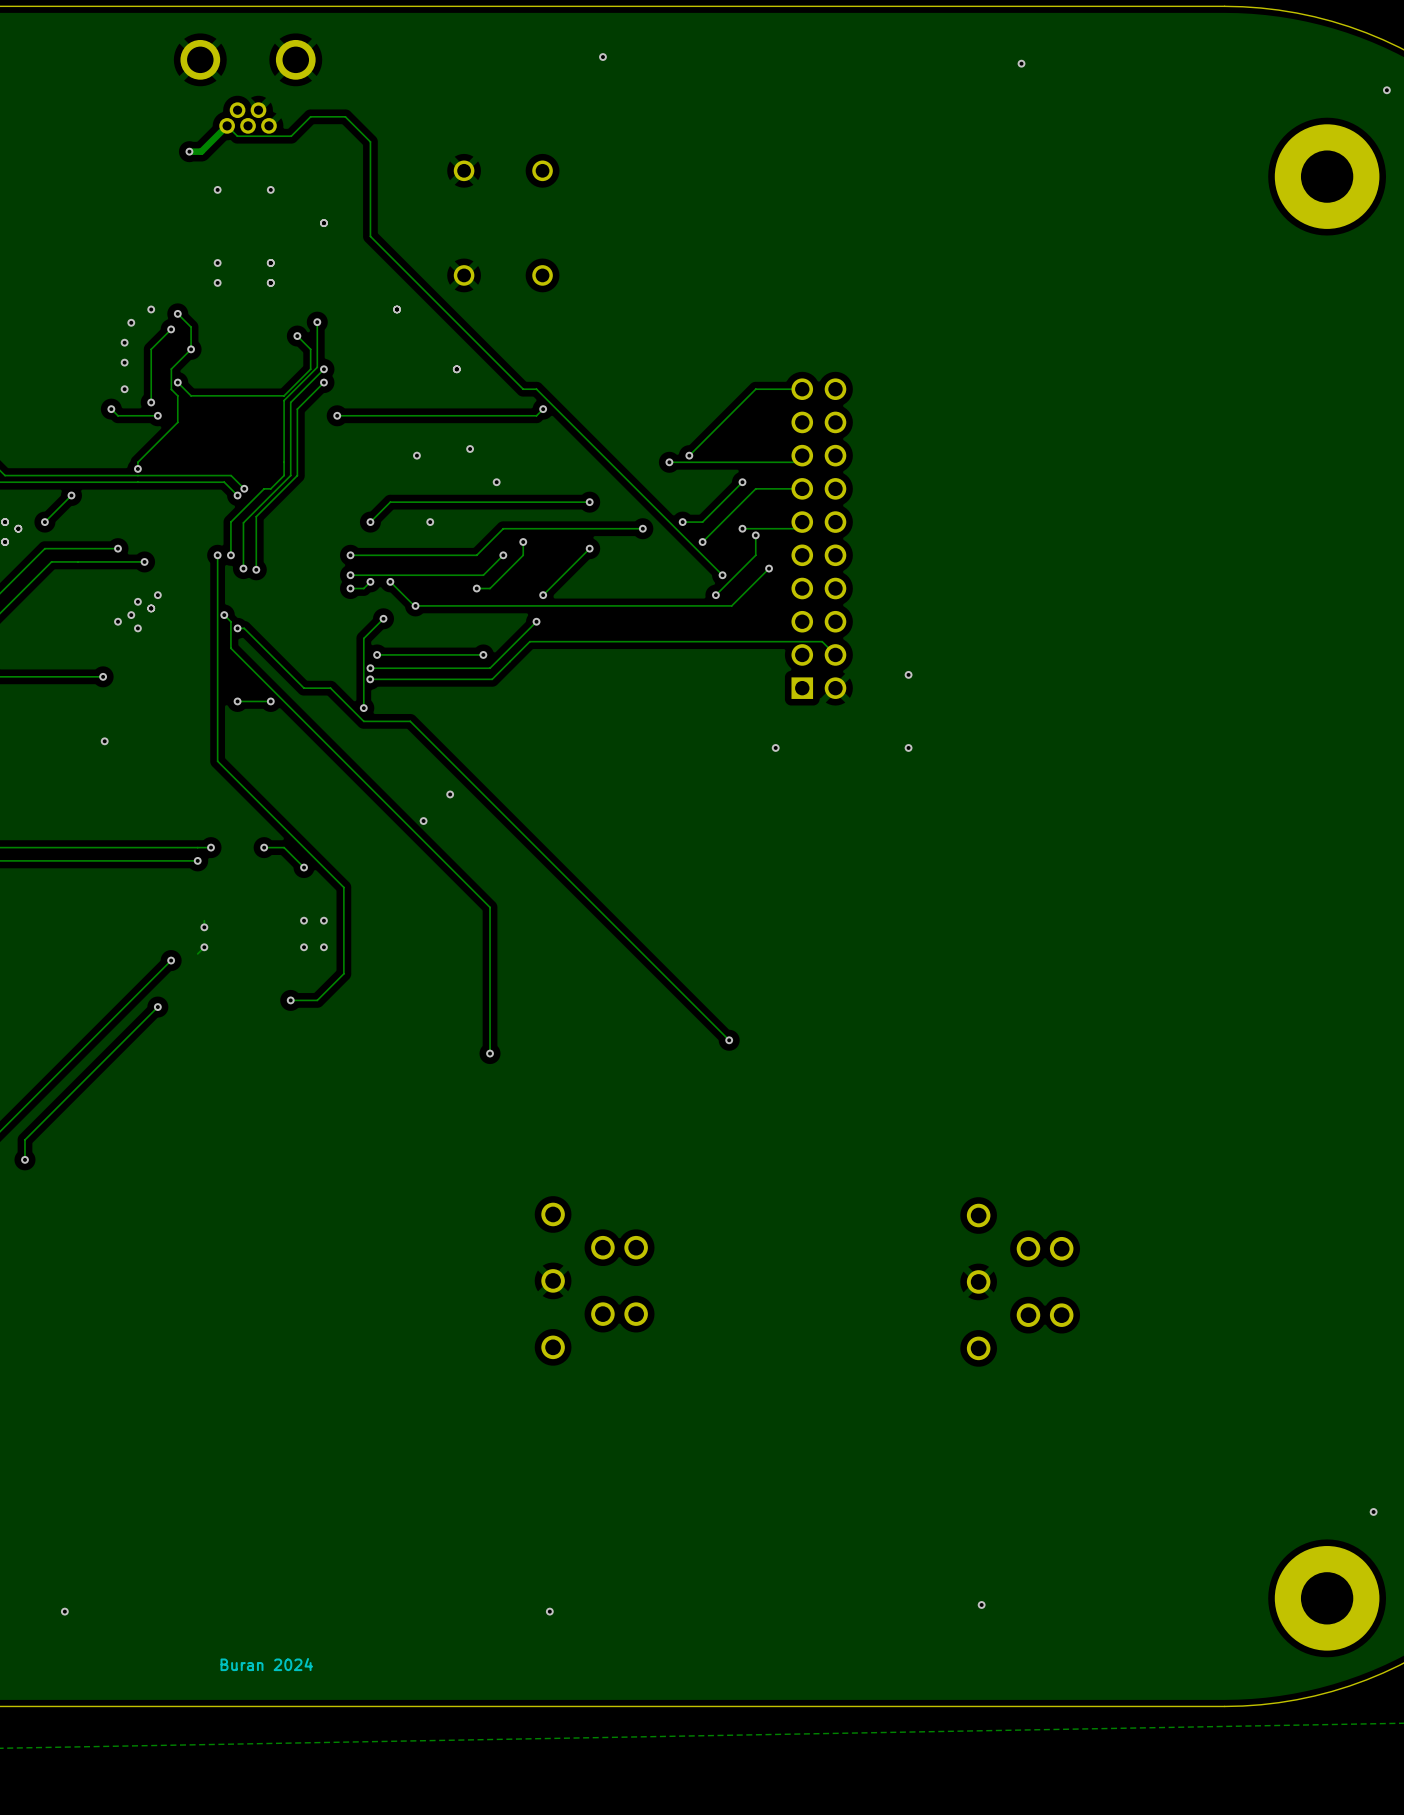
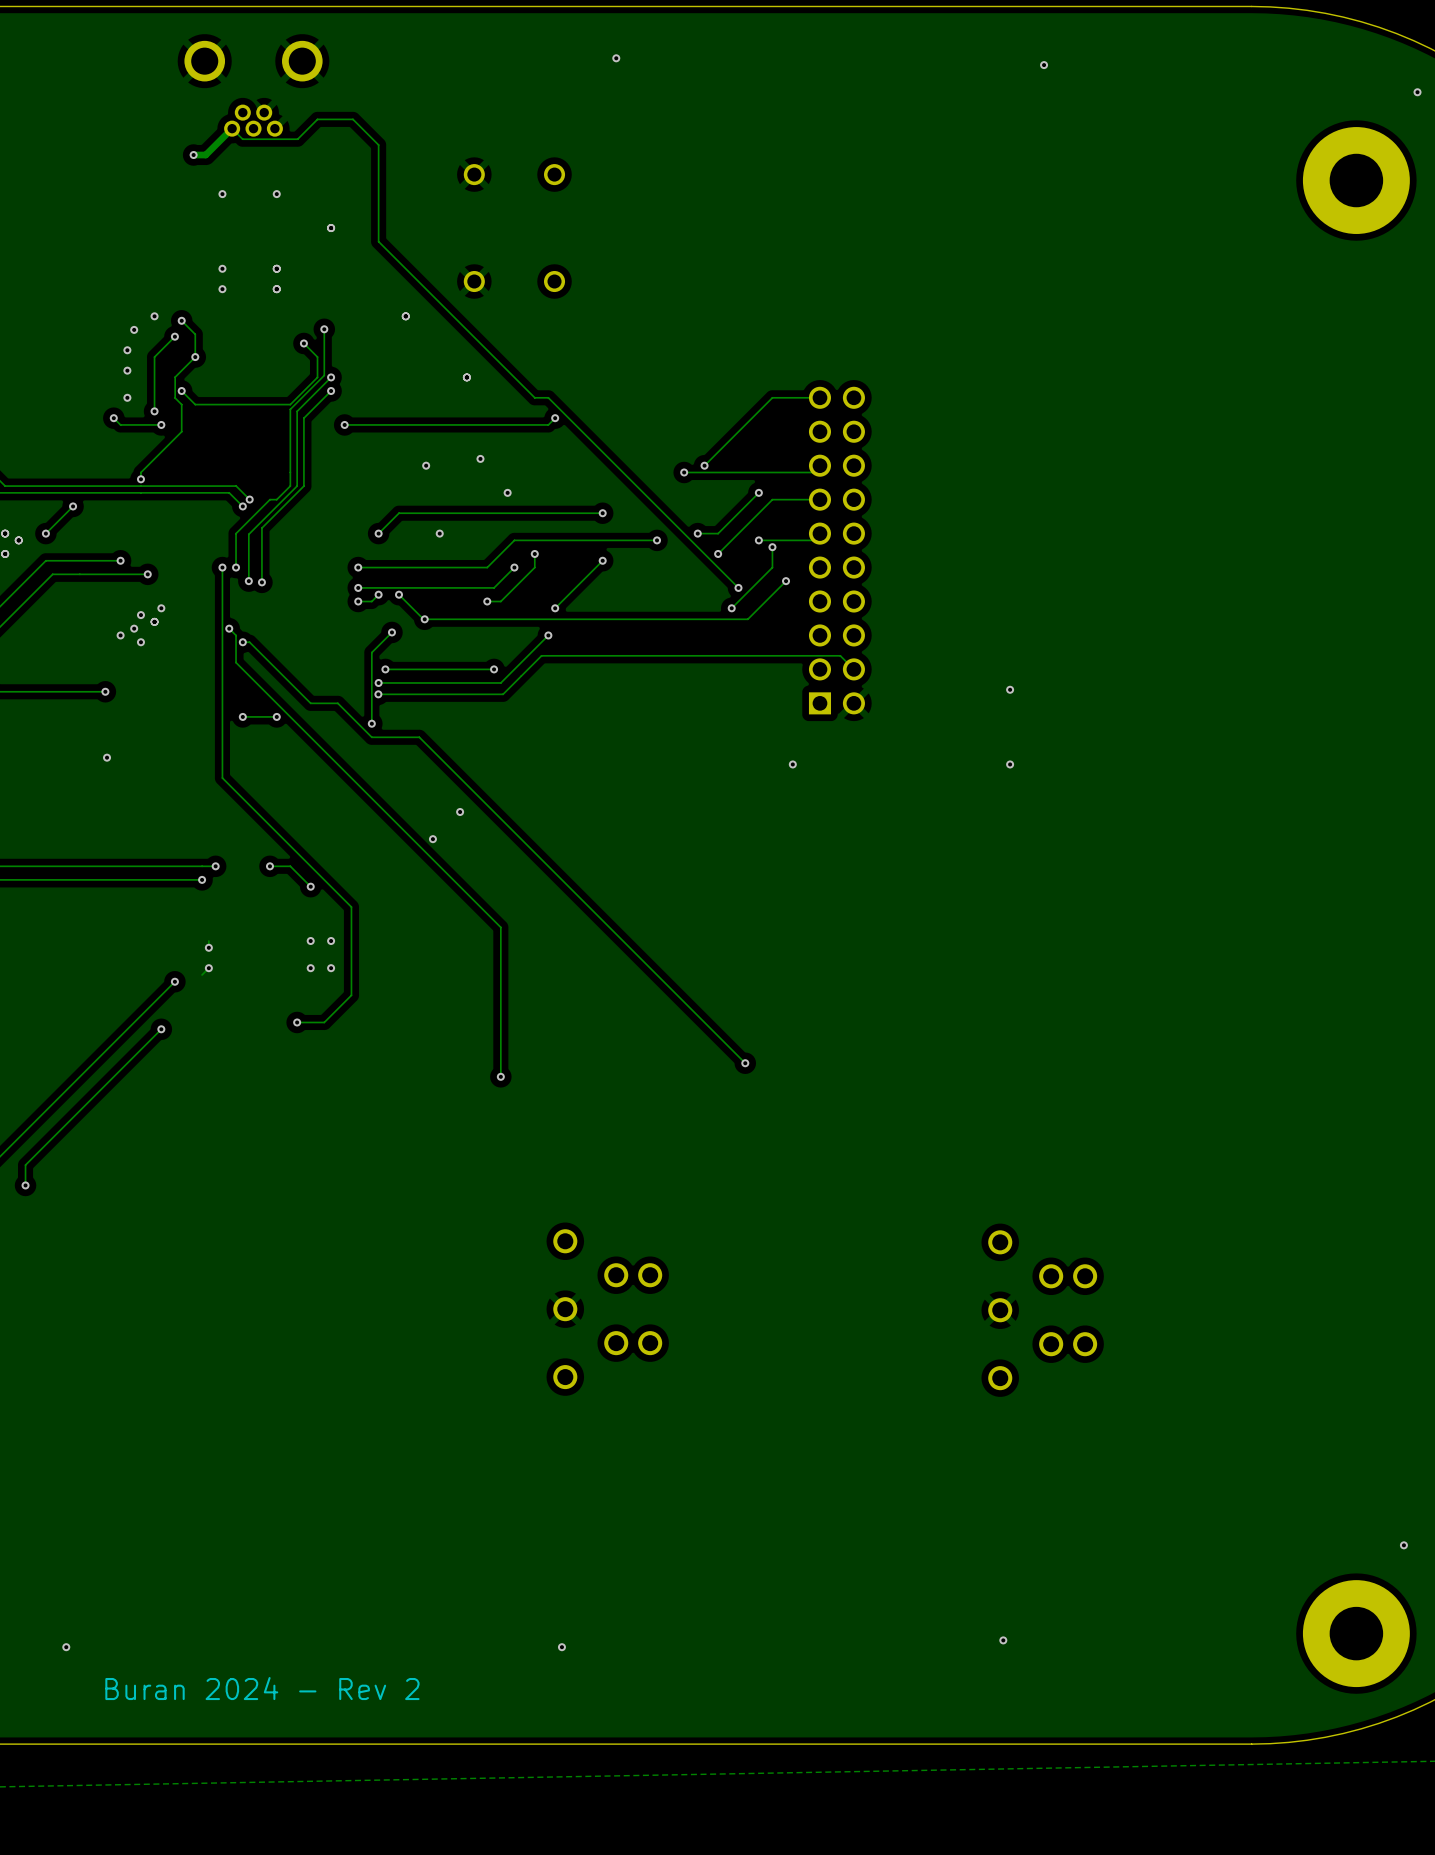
via: (908, 674) -> none
via: none -> (1010, 689)
via: (908, 747) -> none
via: none -> (1010, 764)
text: Buran 2024 (266, 1664) -> Buran 2024 - Rev 2 (262, 1688)

